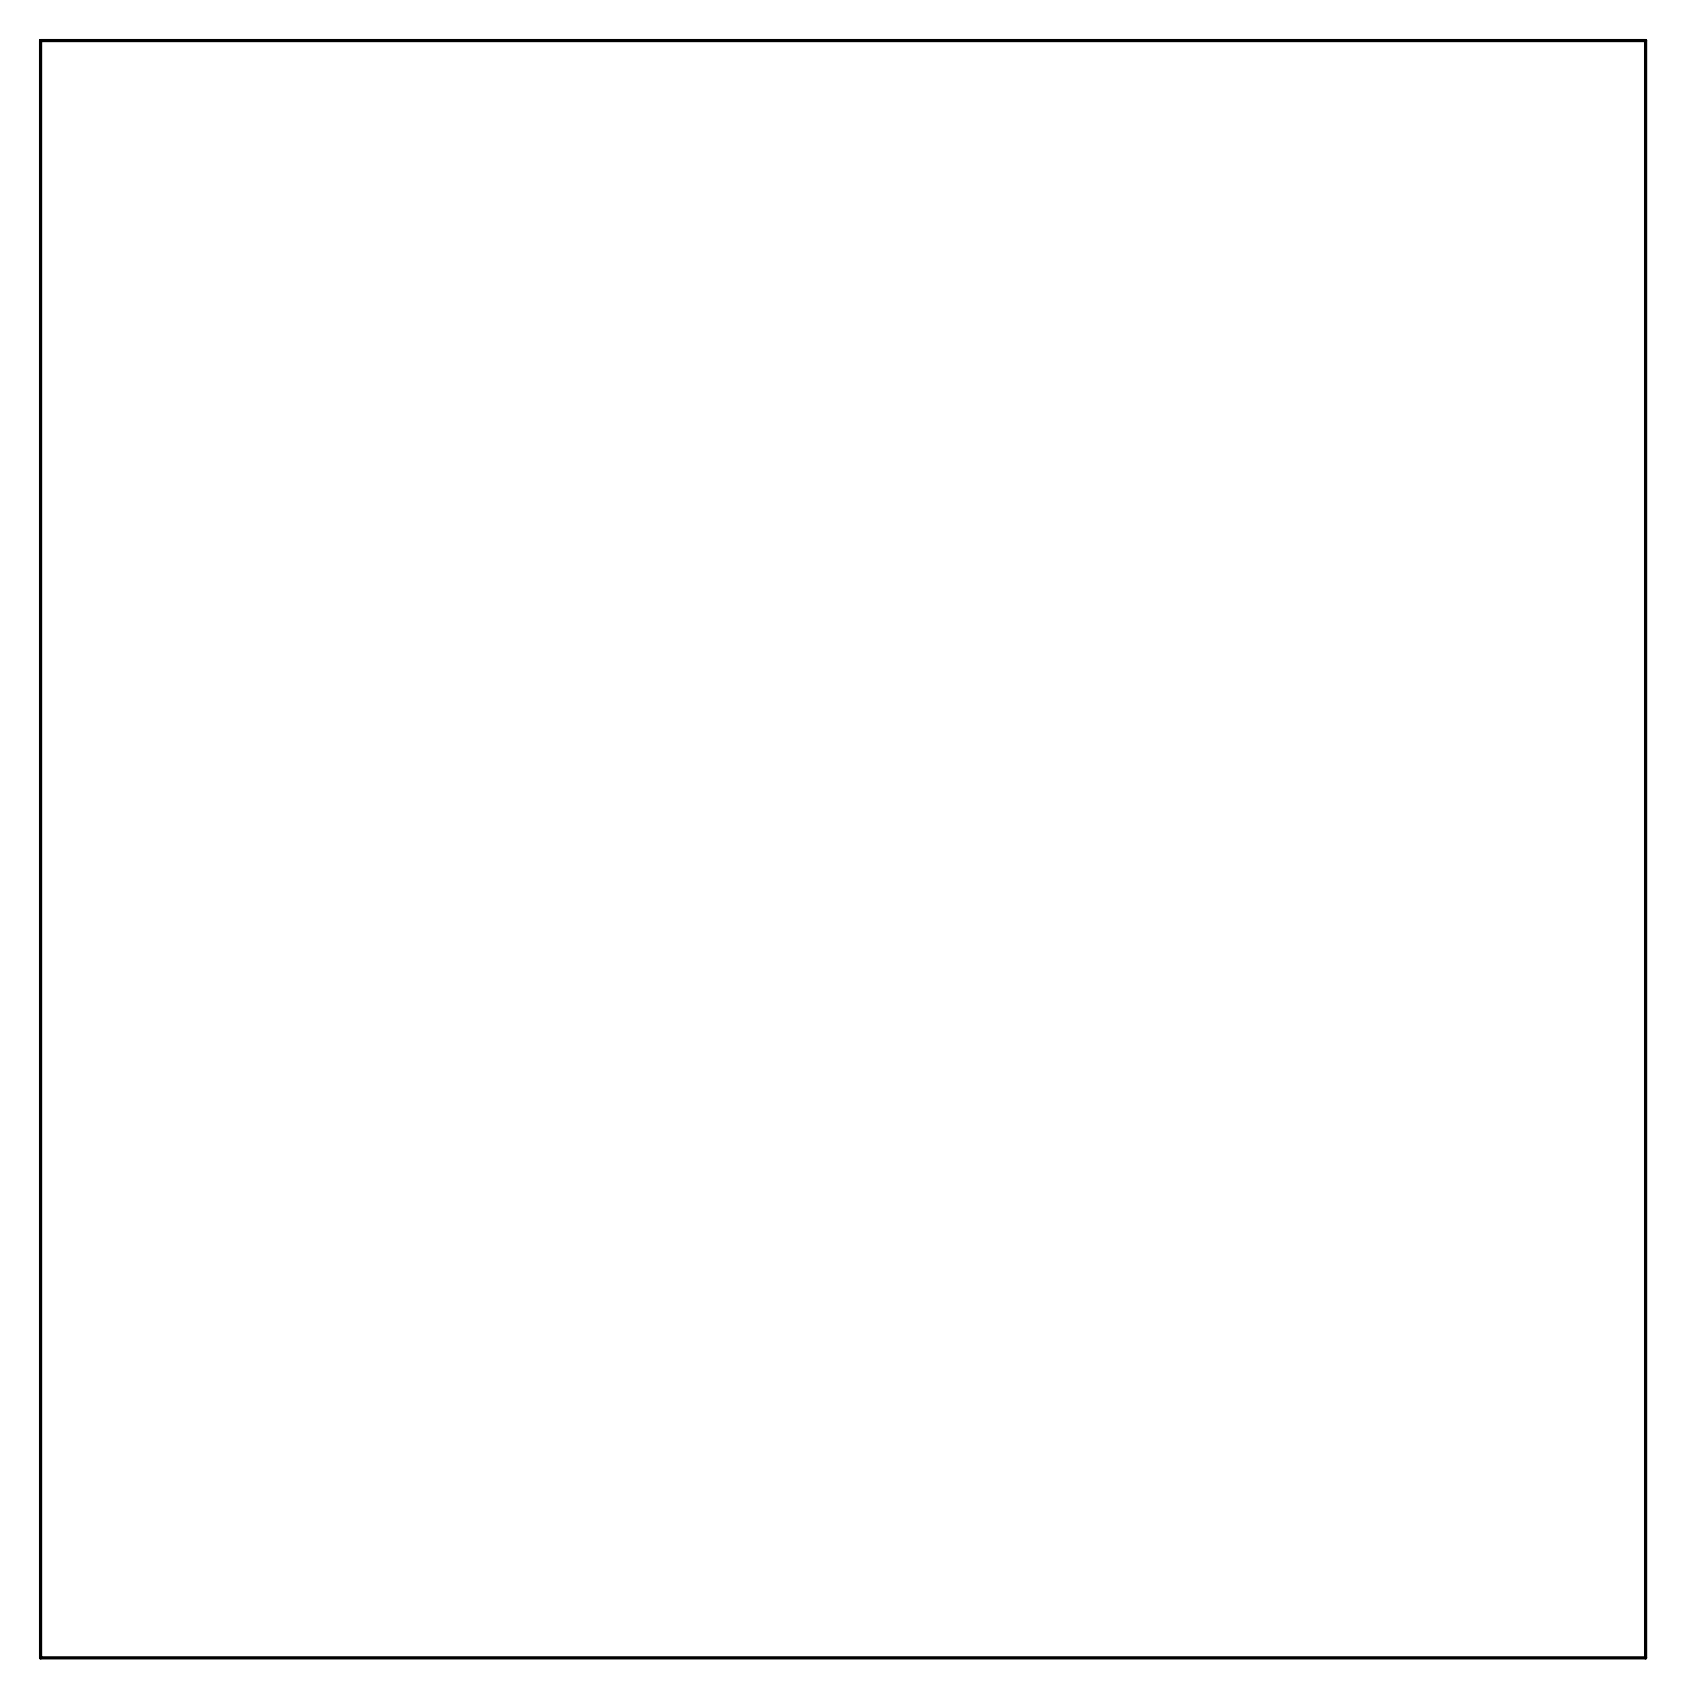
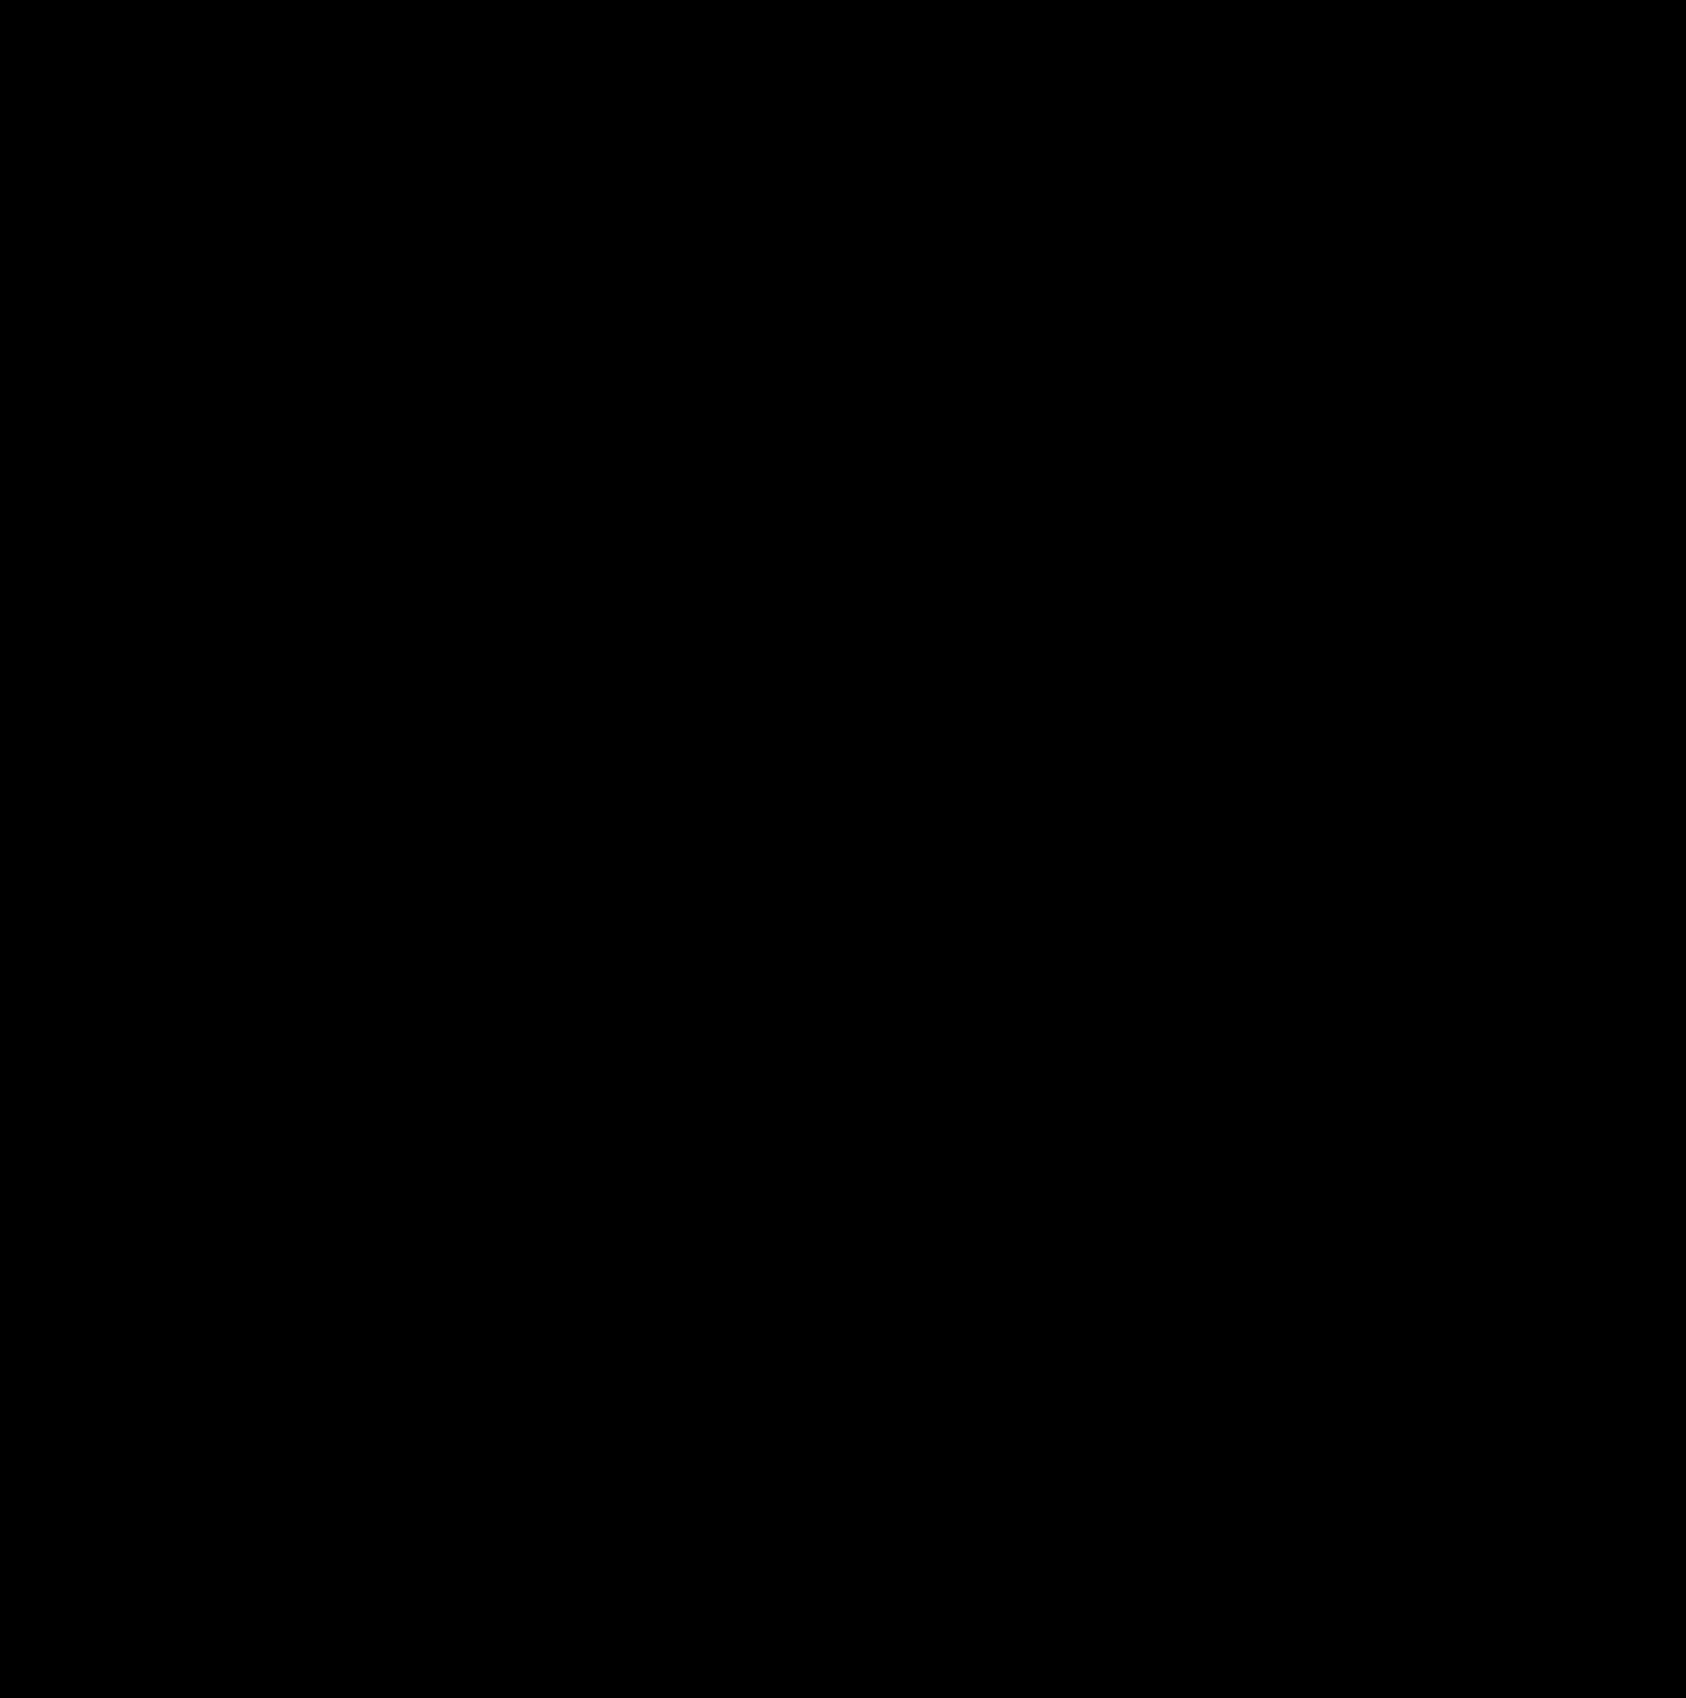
board edge: (40, 40) (40, 1657) (1645, 1657) (1645, 40) (40, 40) -> none

